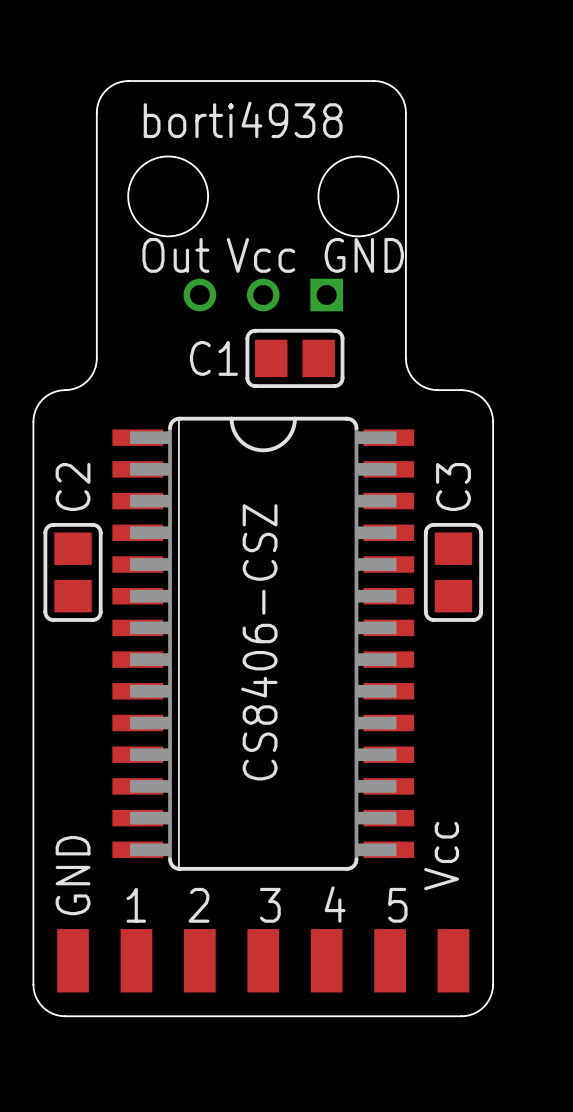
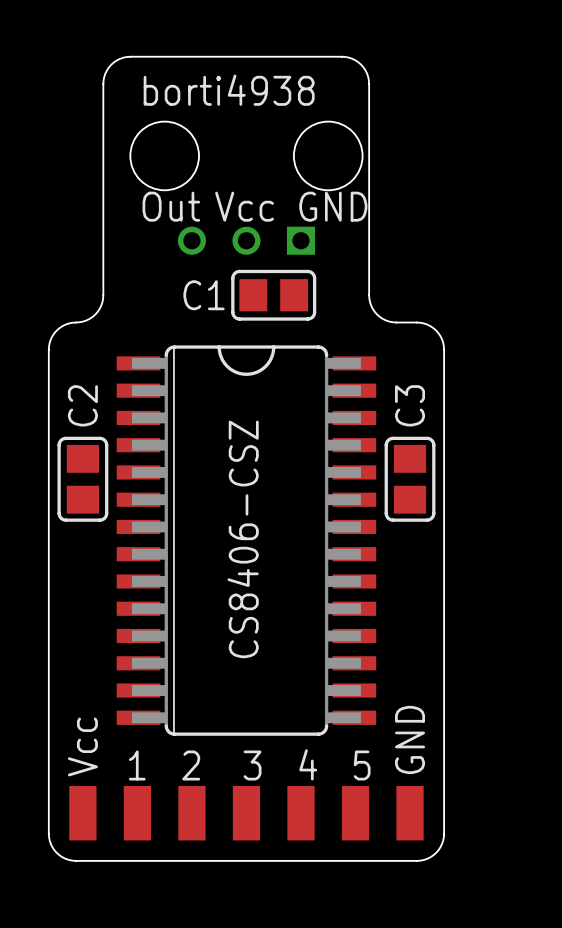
text: Vcc (441, 856) -> none
text: GND (73, 875) -> Vcc (82, 746)
text: none -> GND (410, 739)

